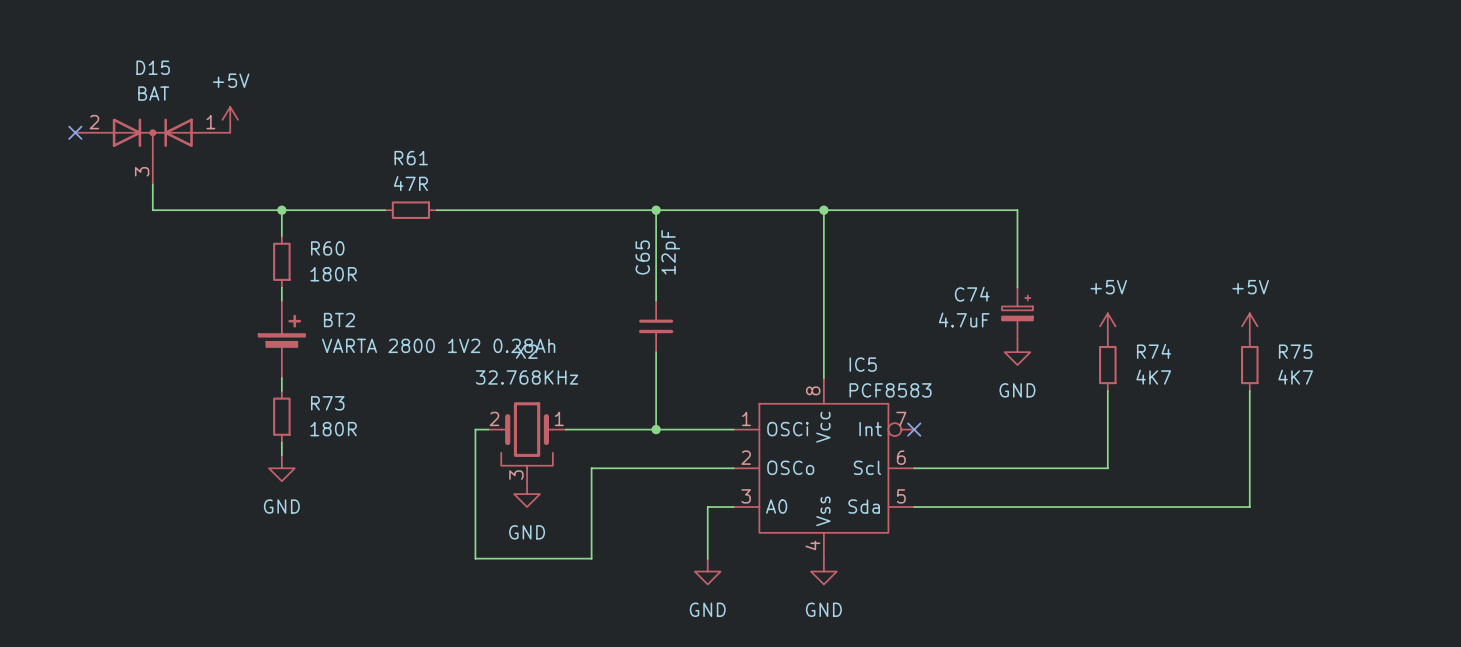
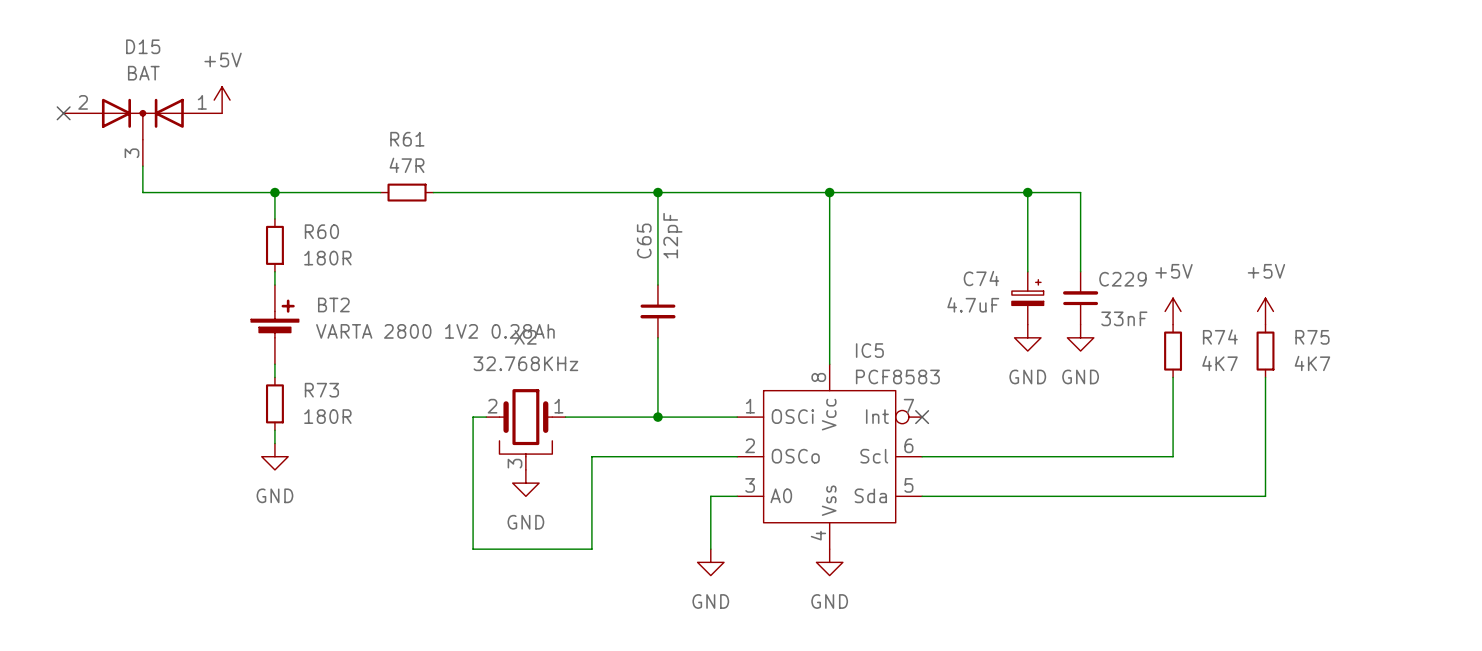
wire: none -> (1027, 192) (1080, 192) (1080, 271)
junction: none -> (1027, 192)
C229: none -> 33nF (1080, 298)
power symbol position: +5V (1107, 326) -> +5V (1173, 311)
power symbol: none -> GND (1080, 337)
R74 position: (1107, 365) -> (1173, 351)
wire: (1107, 390) (1107, 468) -> (1173, 377) (1173, 456) (1120, 456)

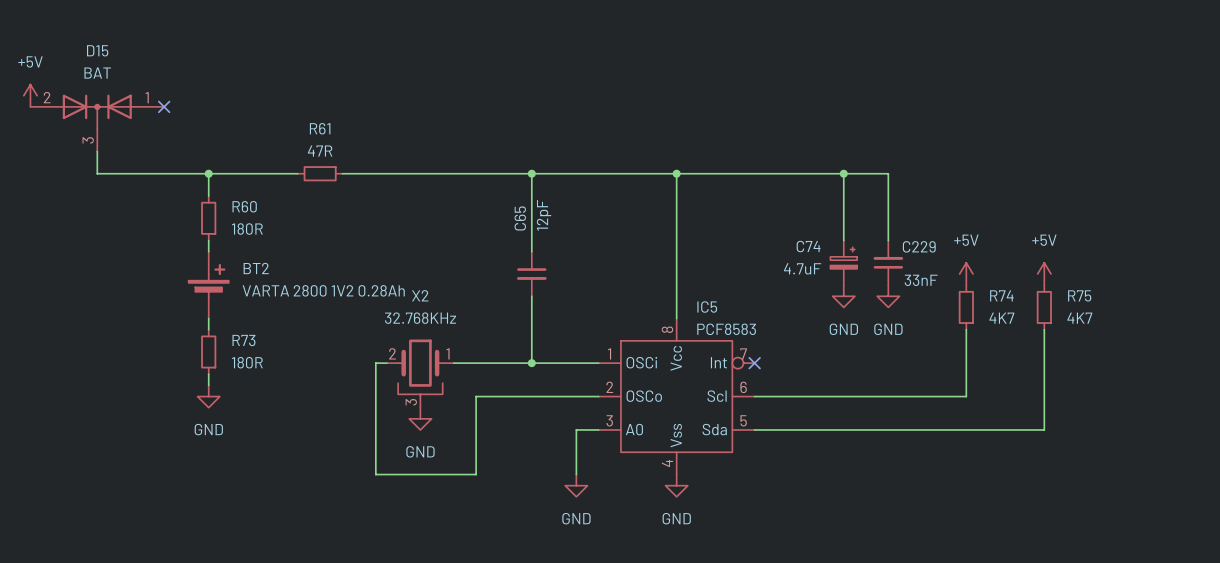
power symbol position: +5V (222, 100) -> +5V (30, 95)
no-connect mark: (63, 113) -> none
no-connect mark: none -> (164, 106)

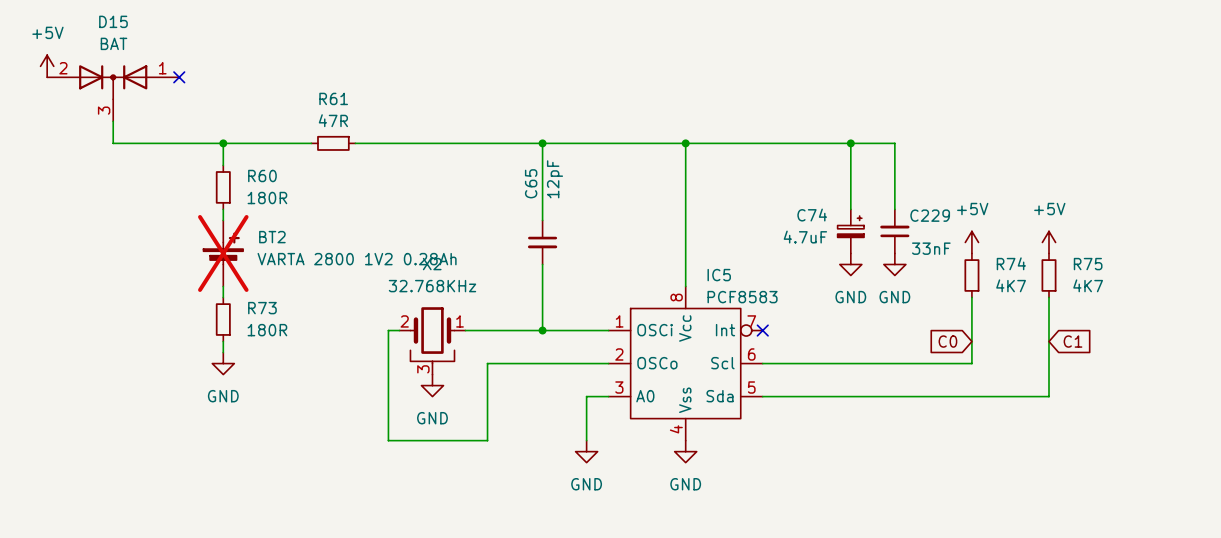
BT2 do-not-place cross: none -> (223, 253)
global label: none -> C0 (947, 341)
global label: none -> C1 (1073, 341)

